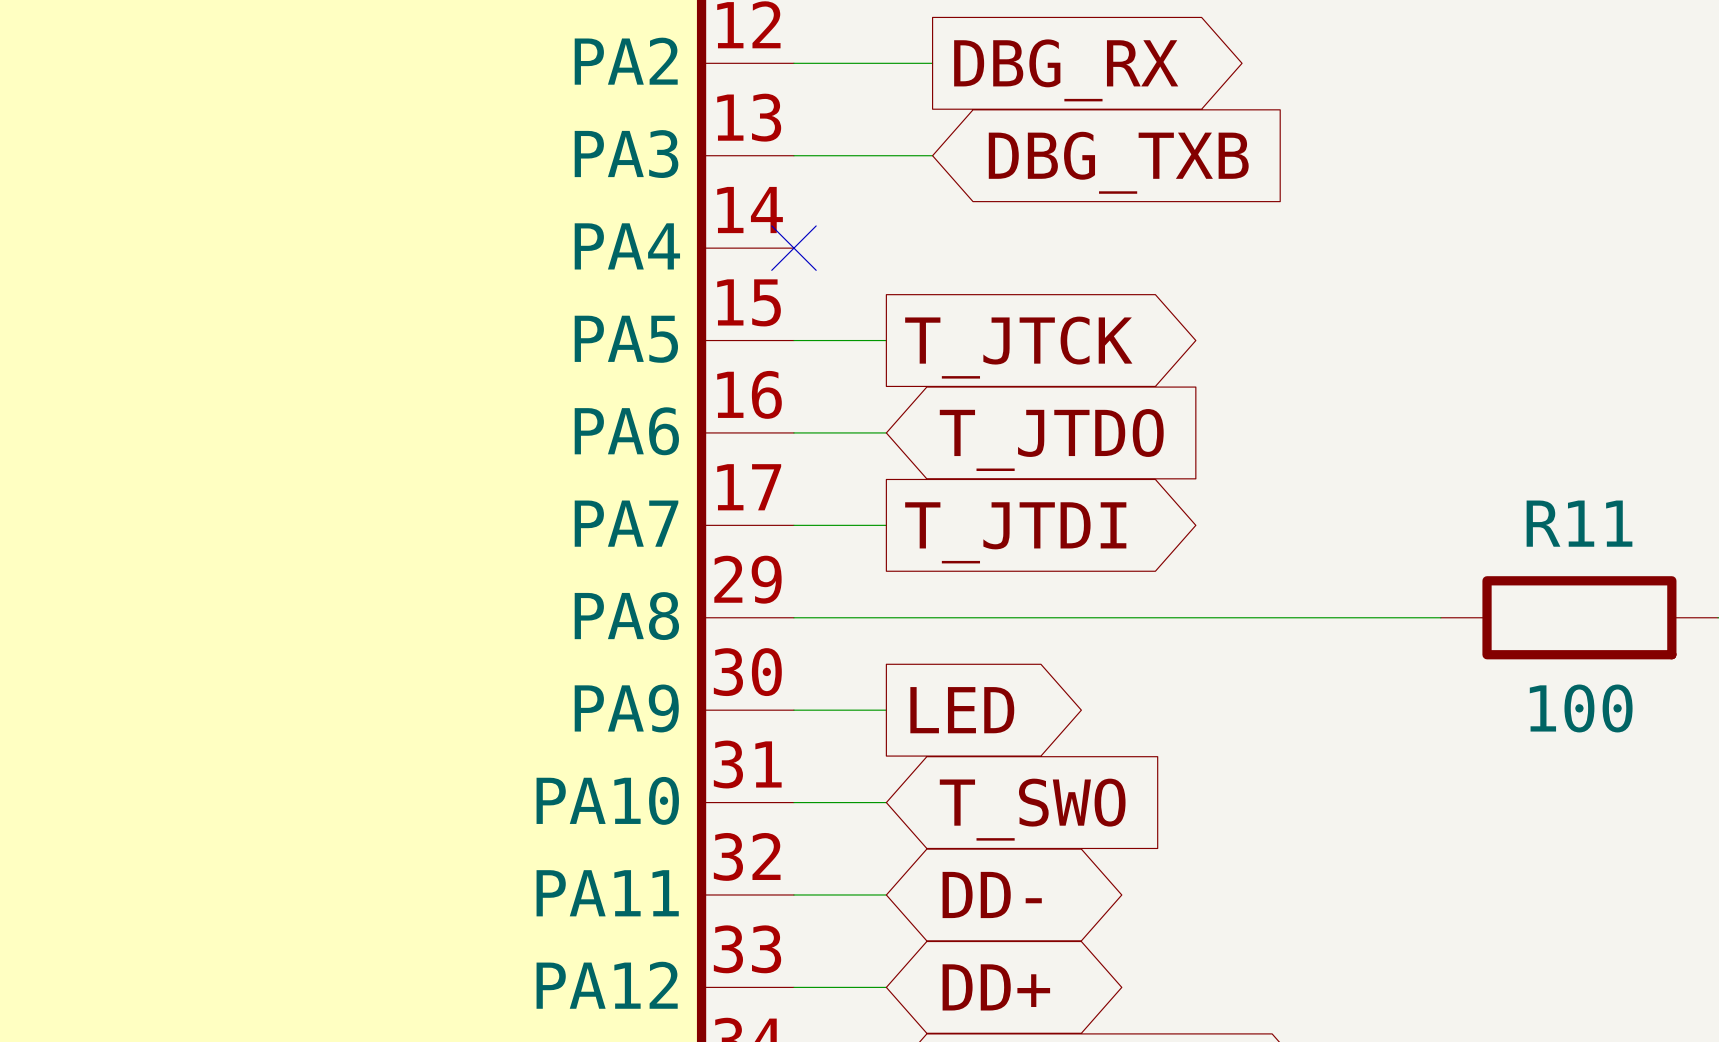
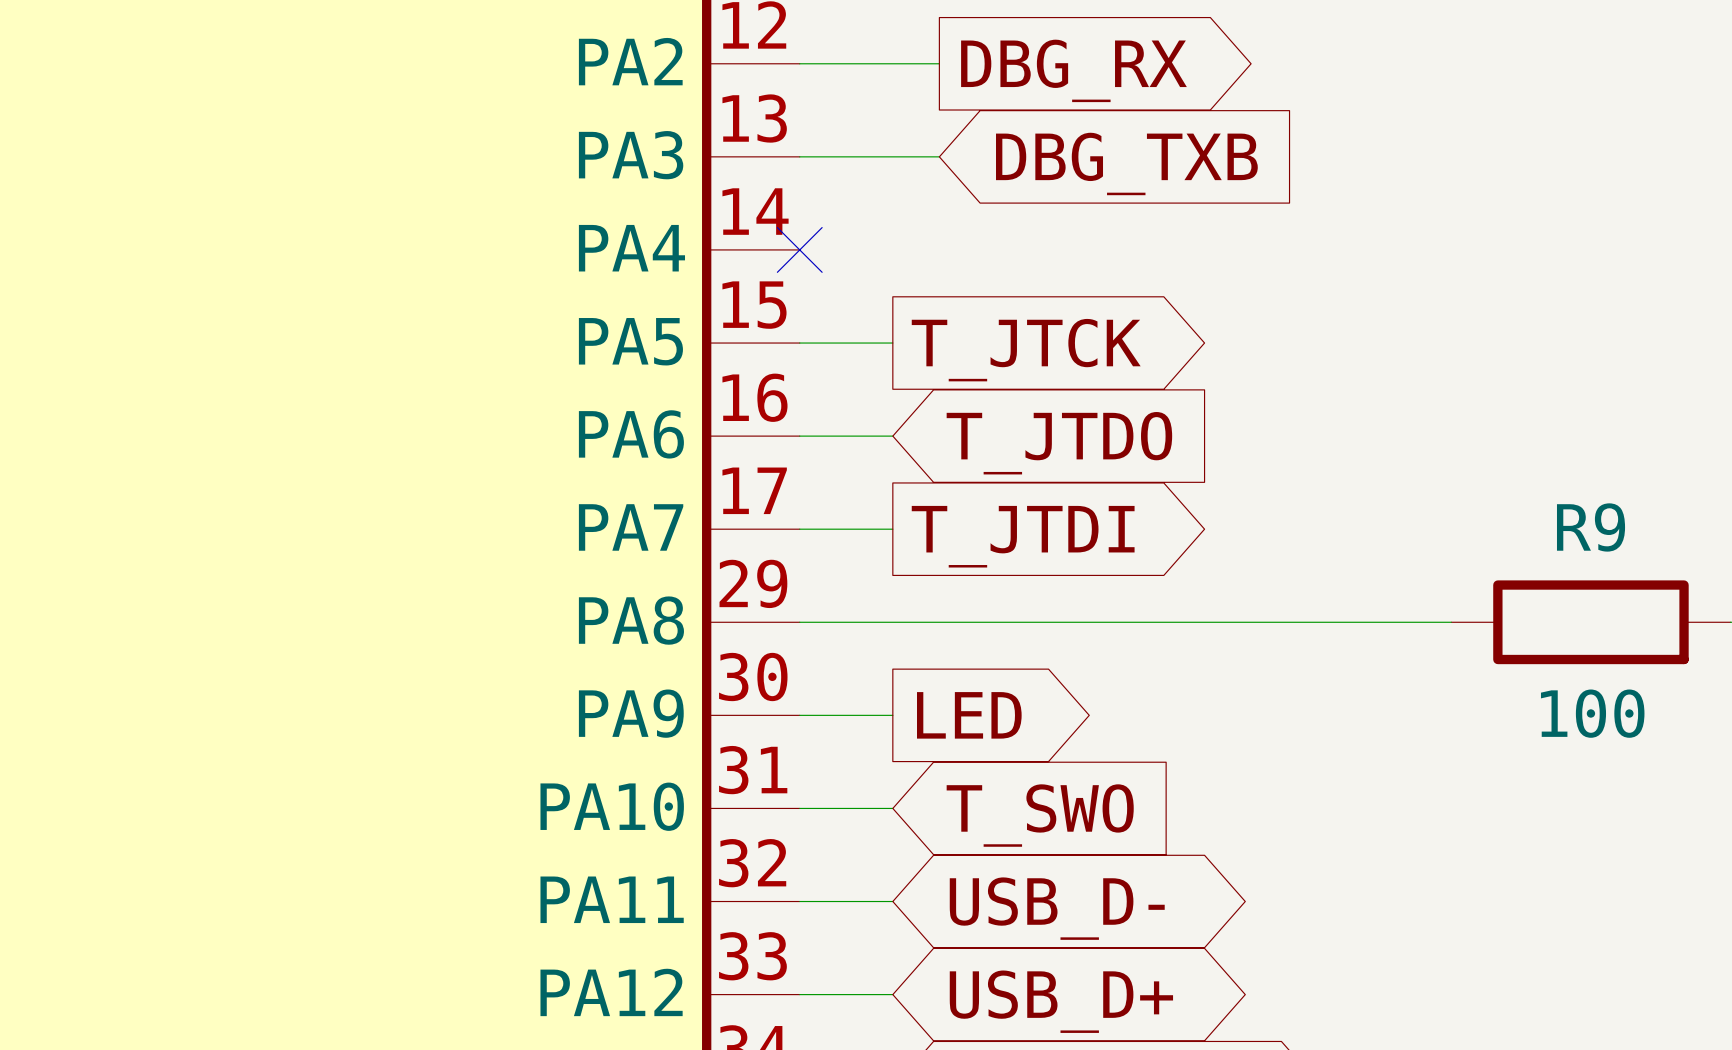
R11 name: R11 (1579, 523) -> R9 (1591, 527)
global label: DD- (992, 894) -> USB_D- (1057, 908)
global label: DD+ (996, 987) -> USB_D+ (1061, 1001)

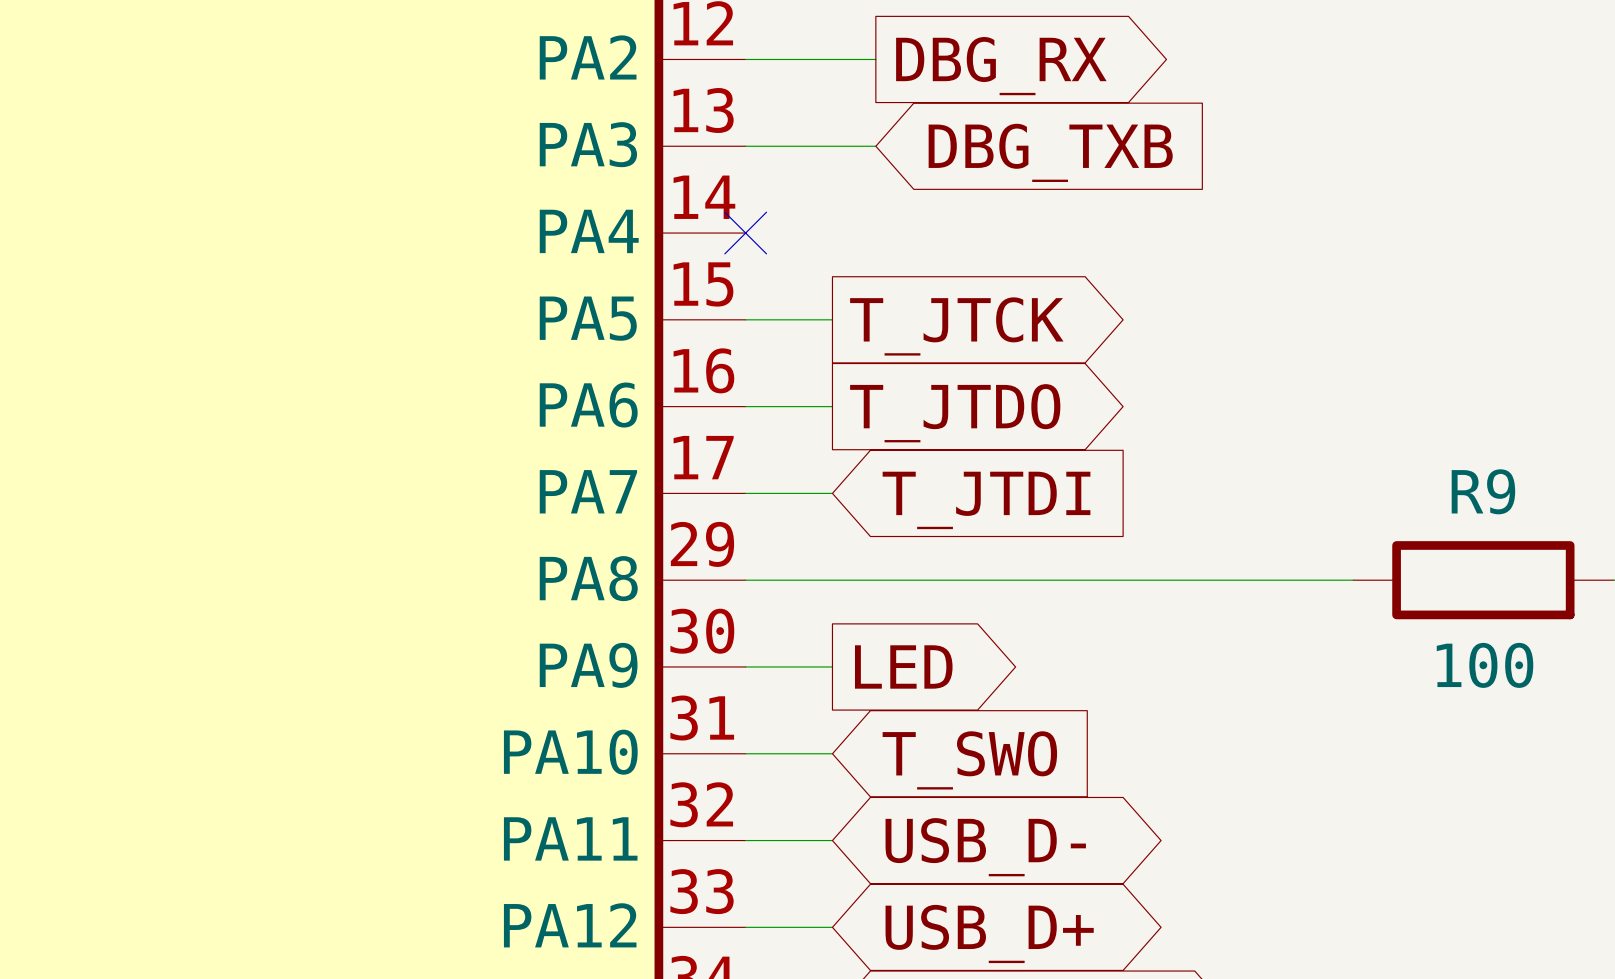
global label shape: input (1059, 443) -> output (955, 413)
global label shape: output (1023, 536) -> input (986, 500)

